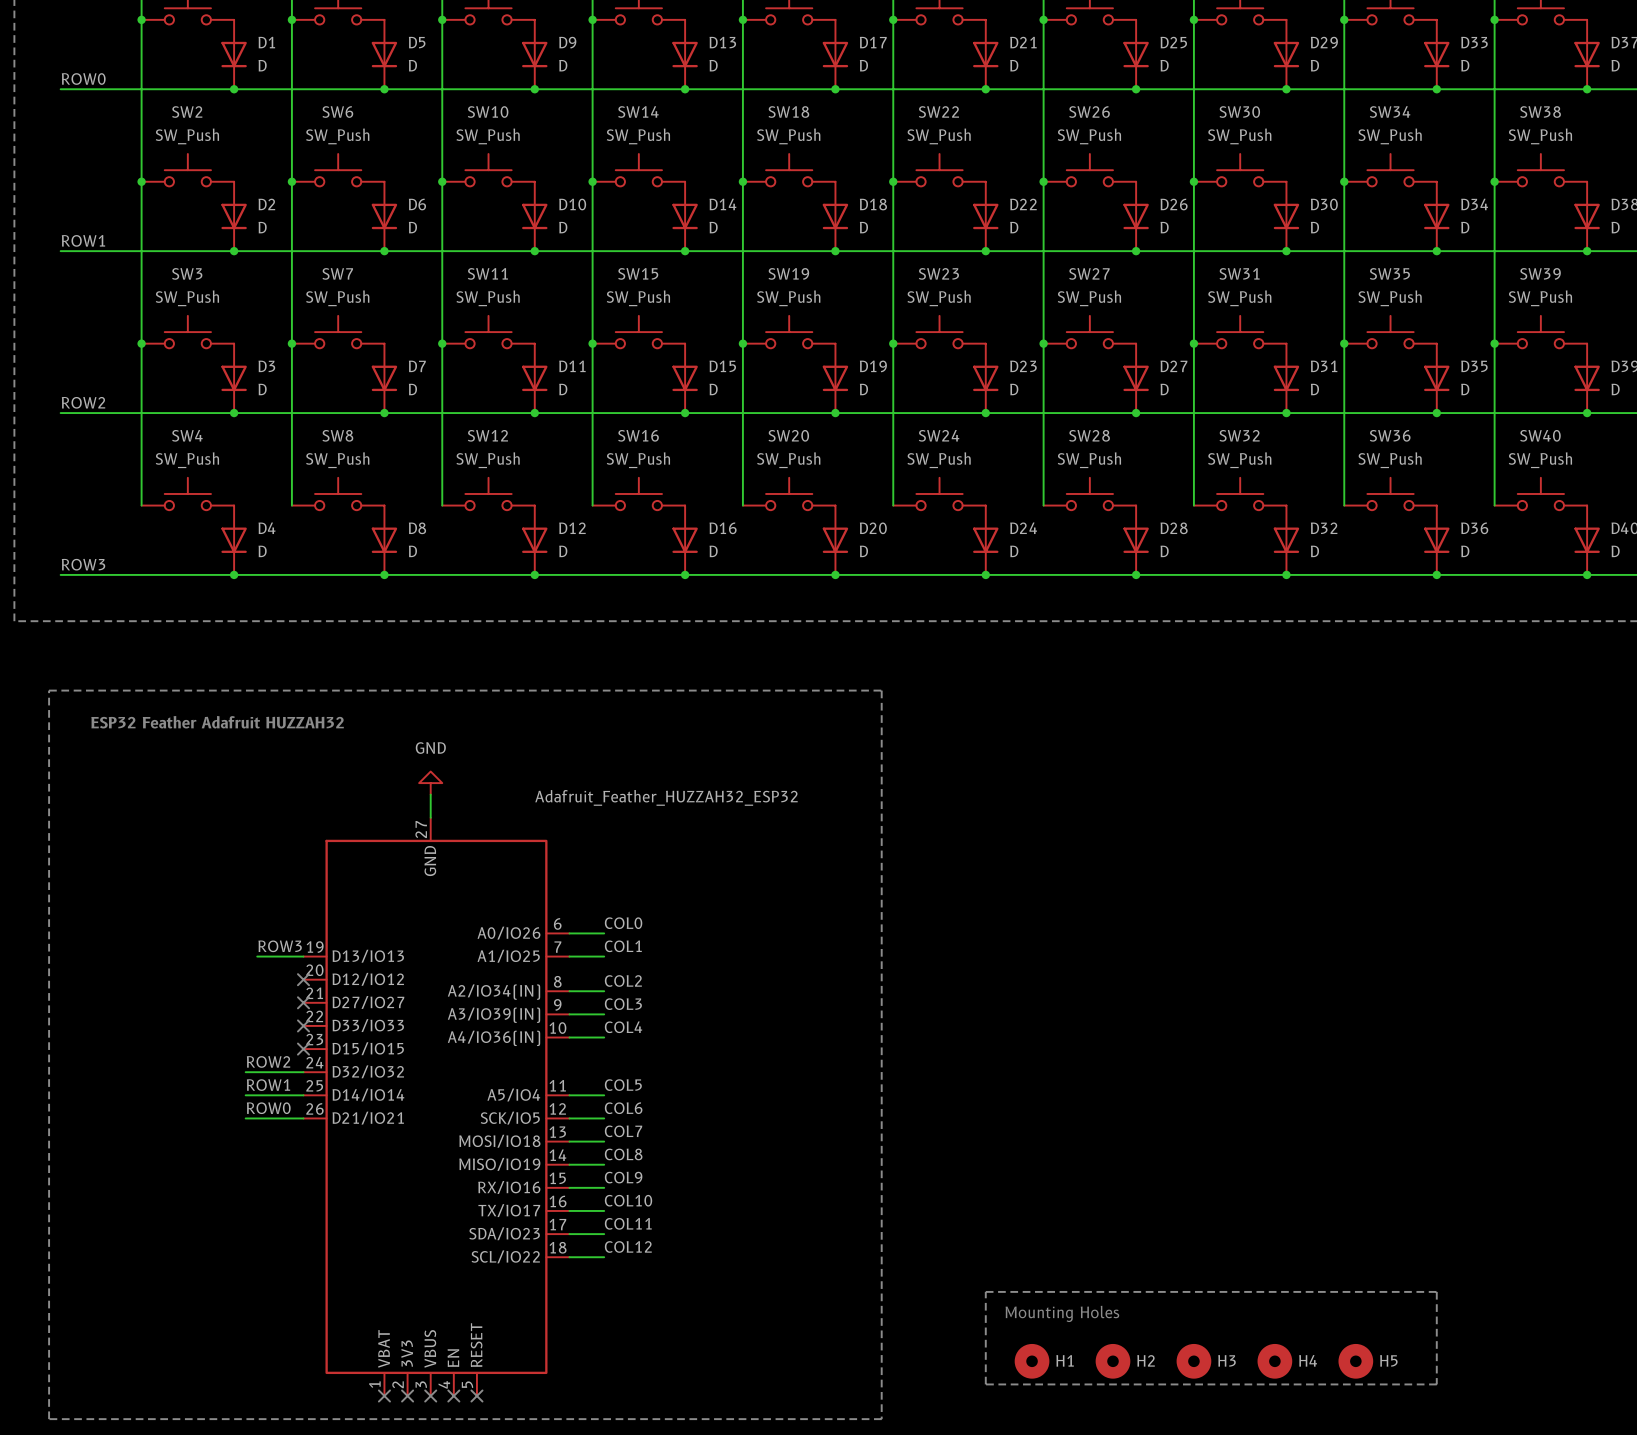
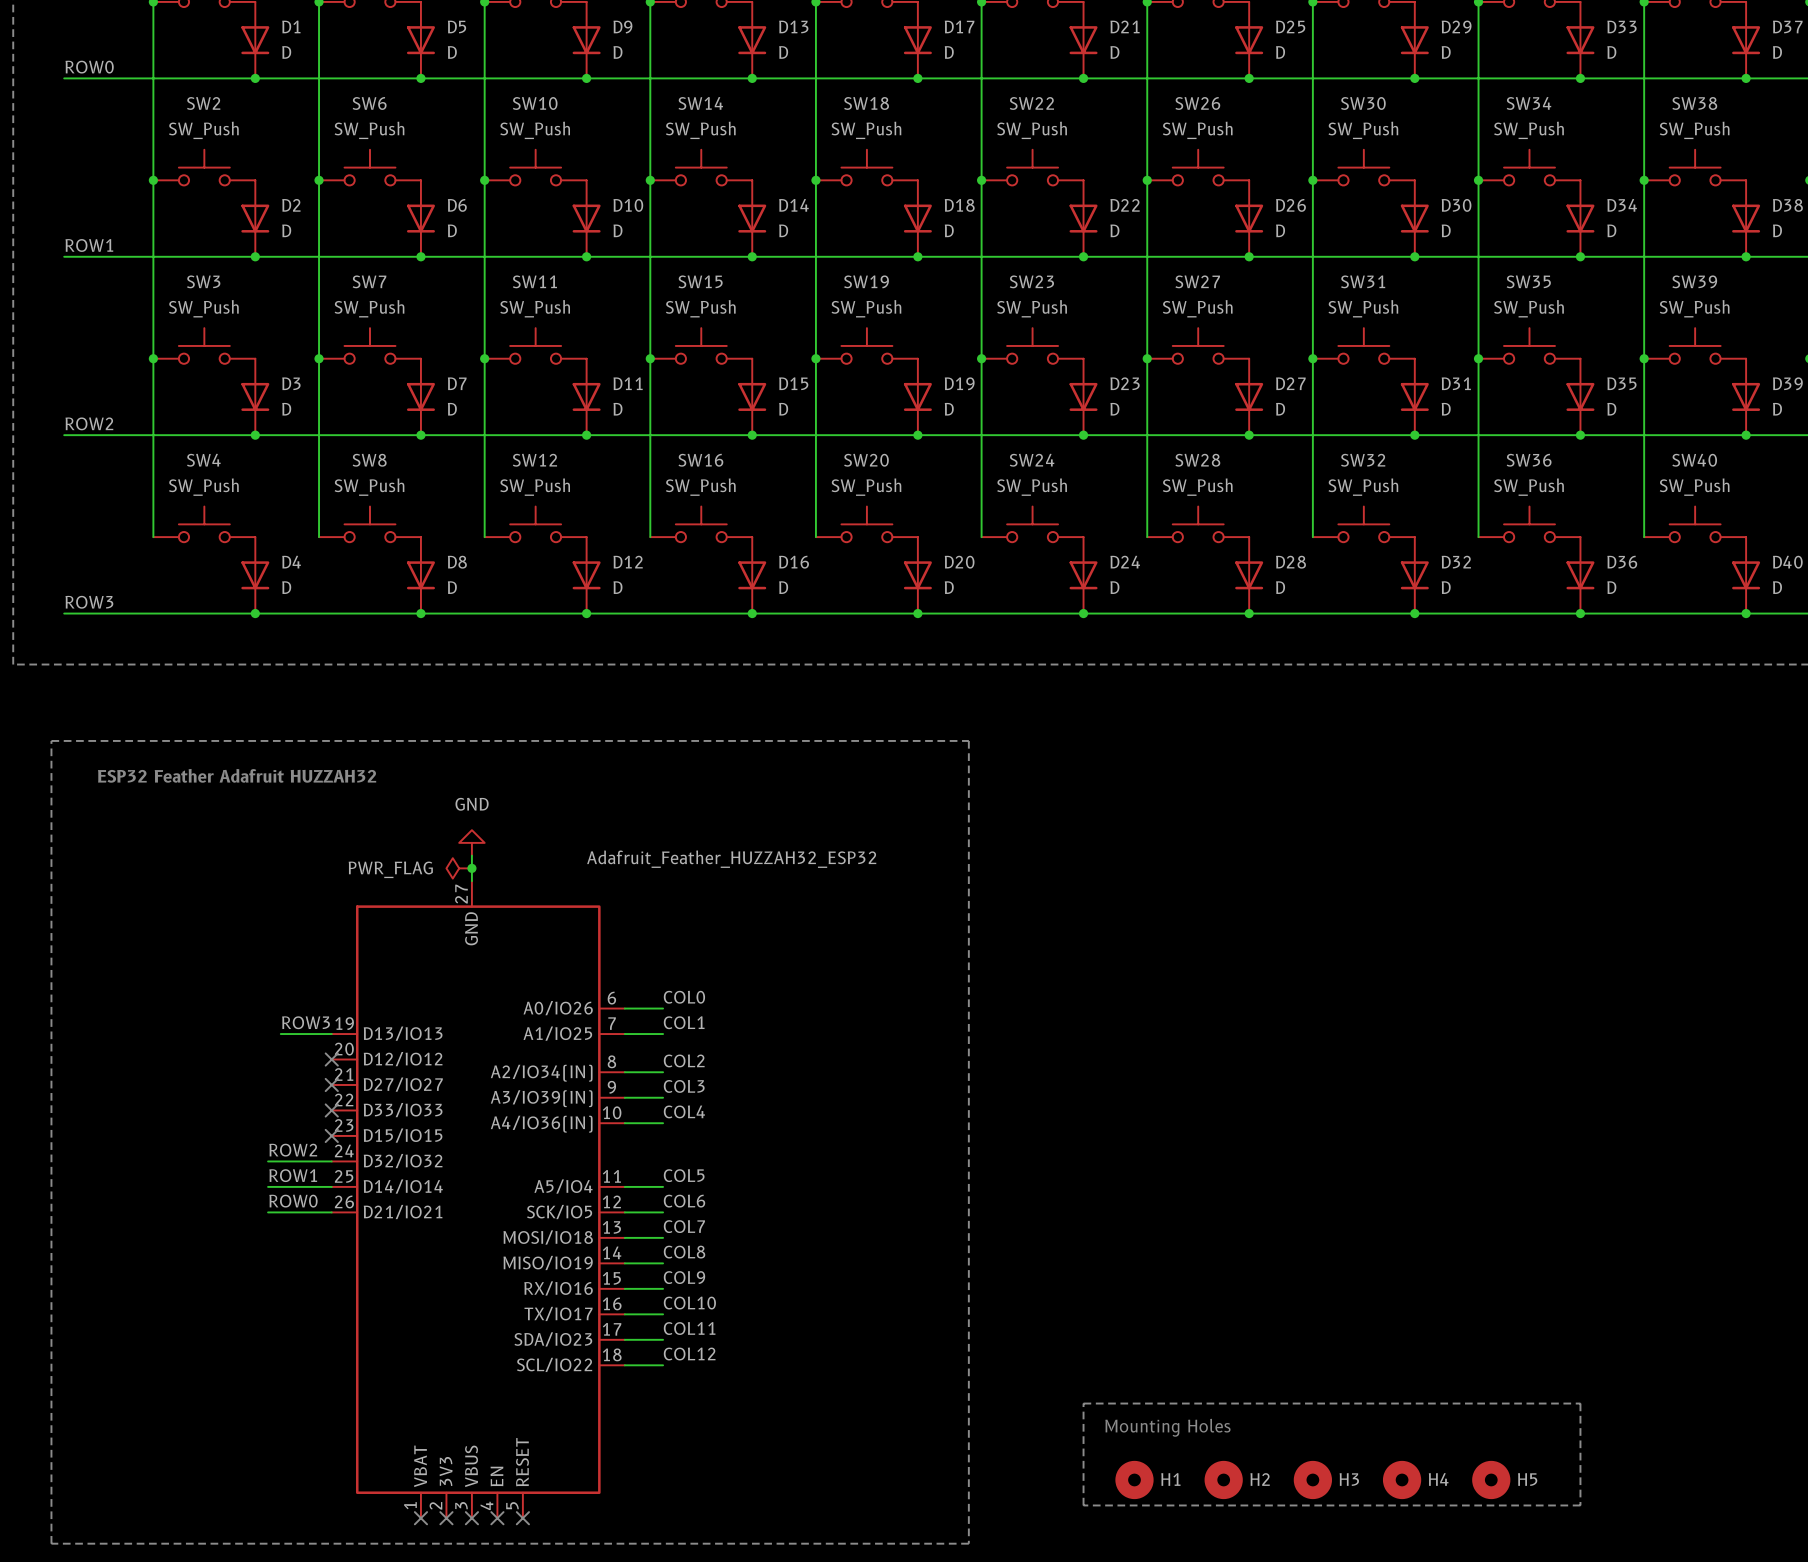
power symbol: none -> PWR_FLAG (459, 868)
junction: none -> (471, 868)

